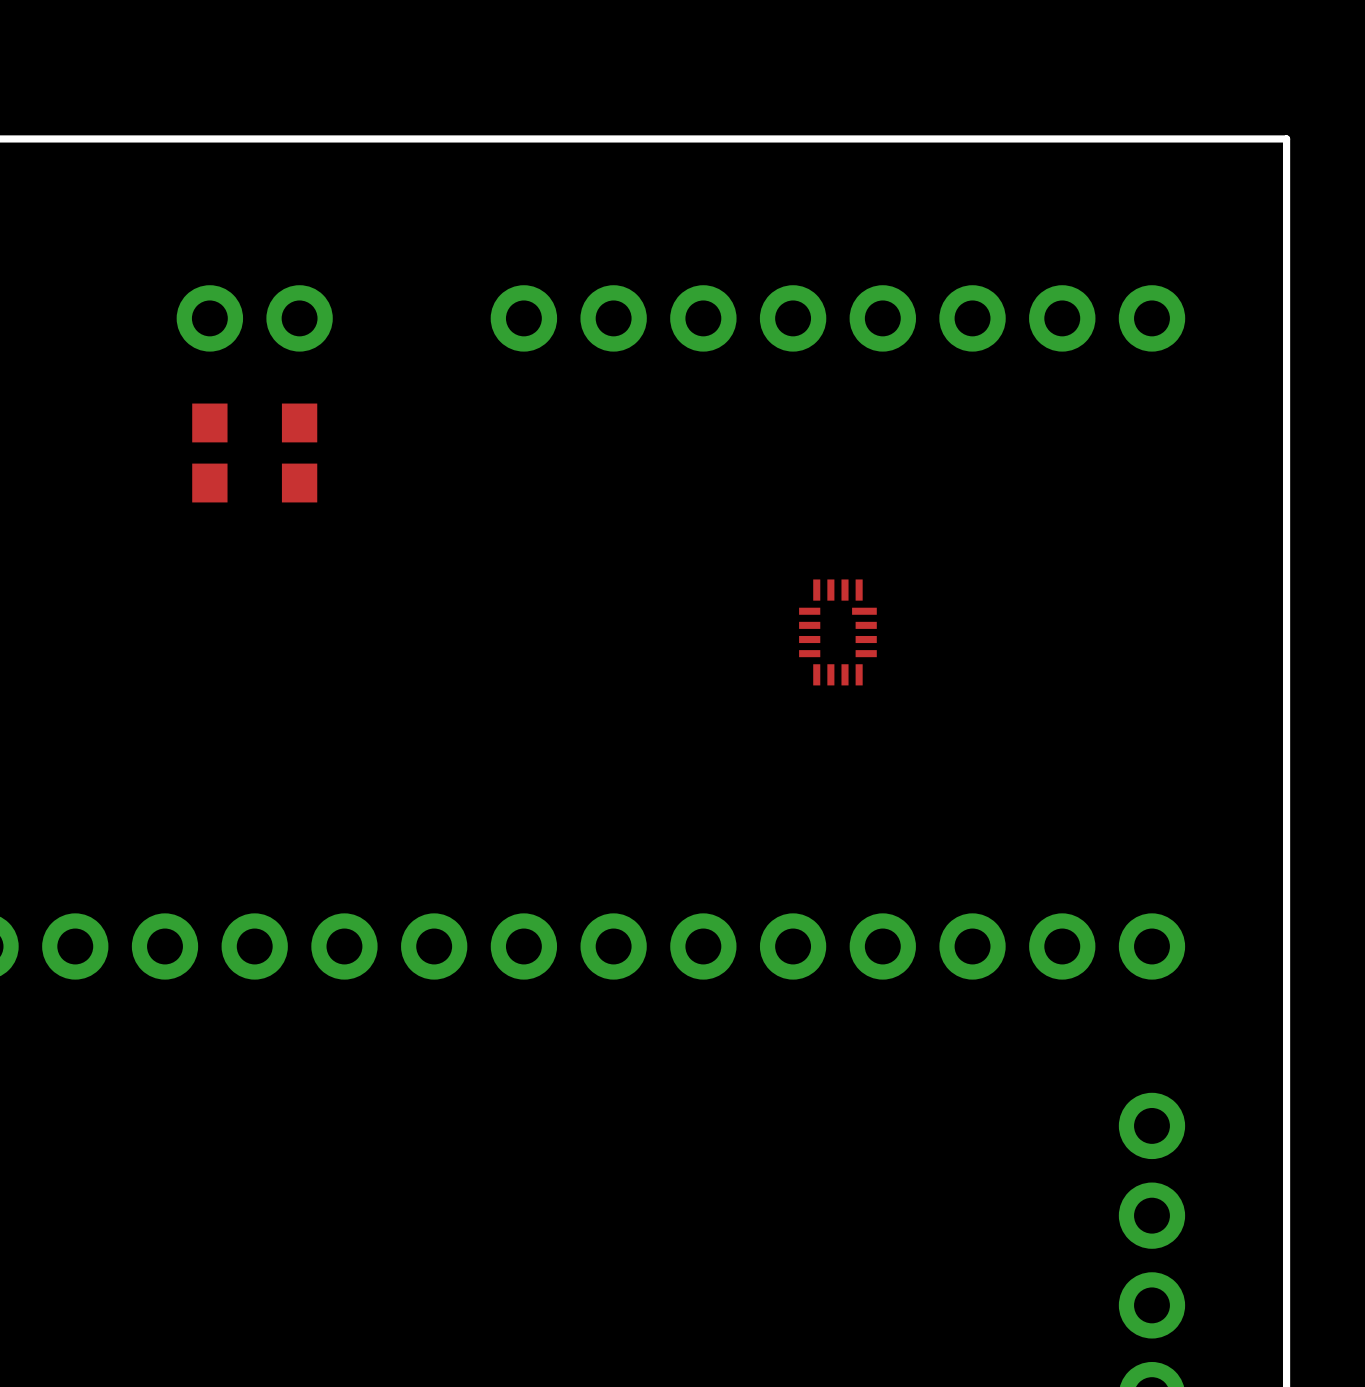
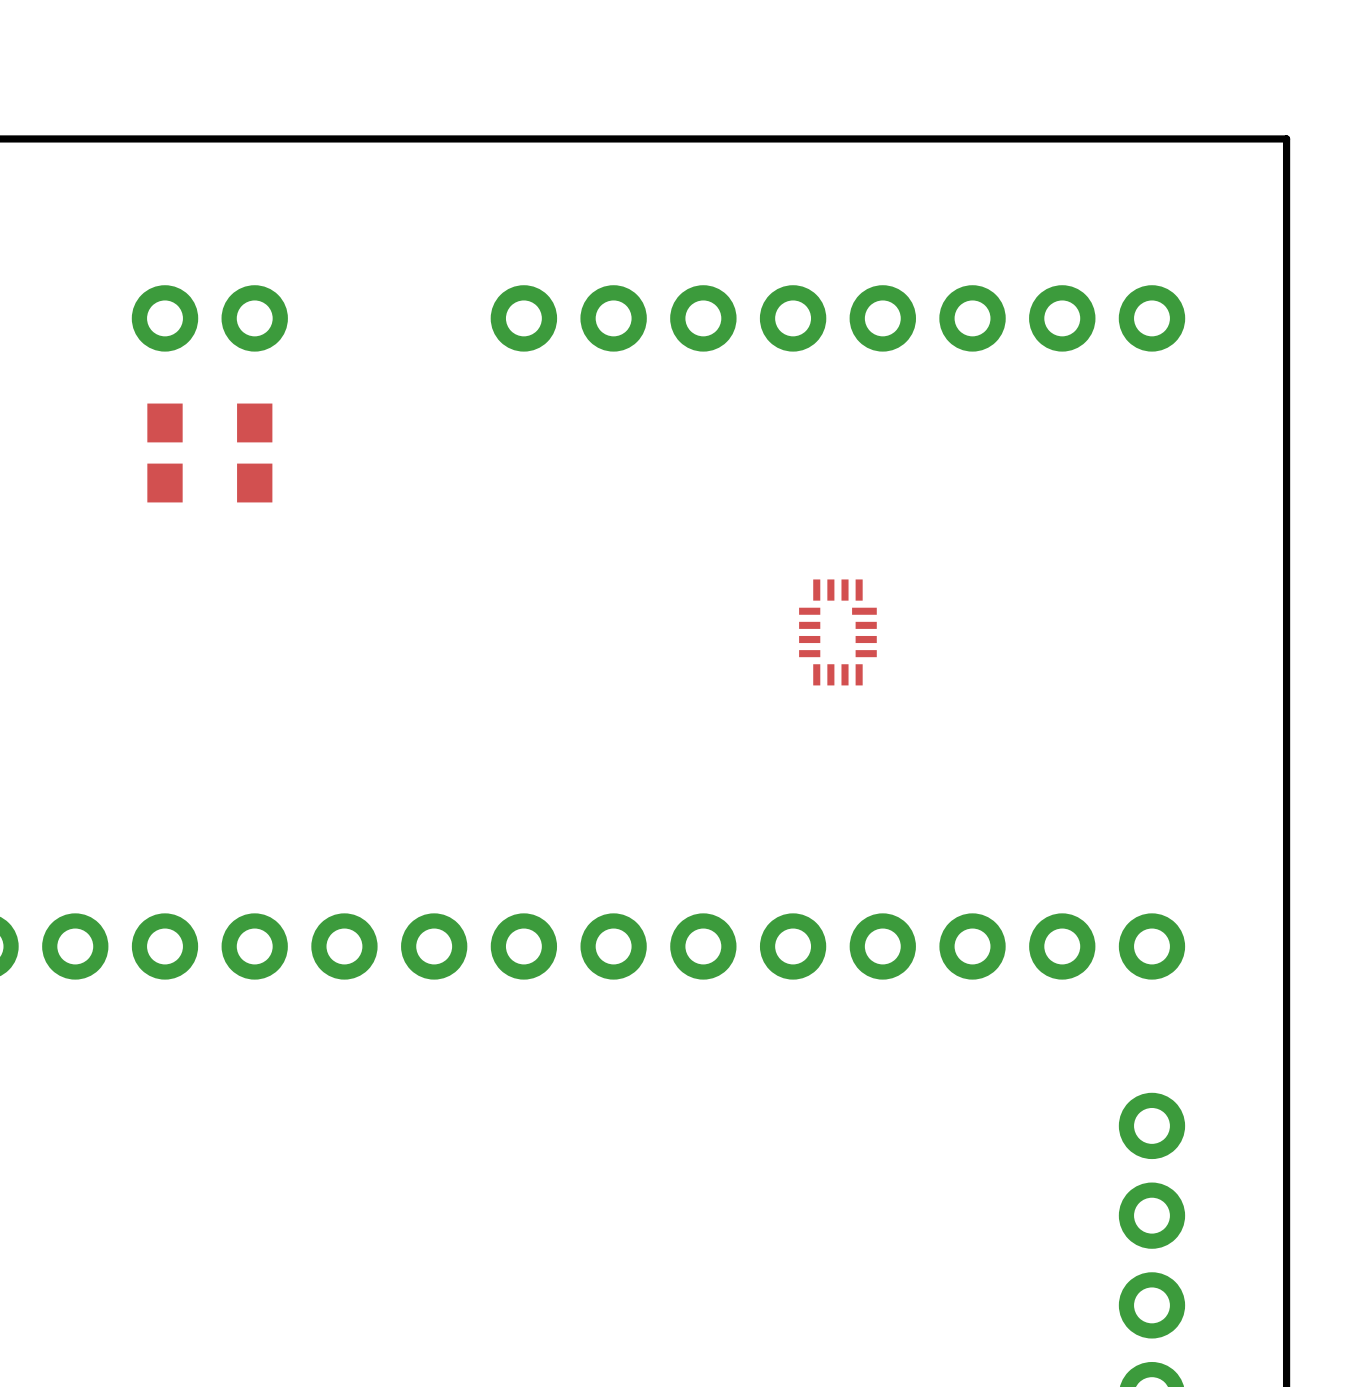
part position: (254, 318) -> (209, 318)
part: none -> (165, 452)
part: (209, 452) -> none
part: none -> (254, 452)
part: (299, 452) -> none

